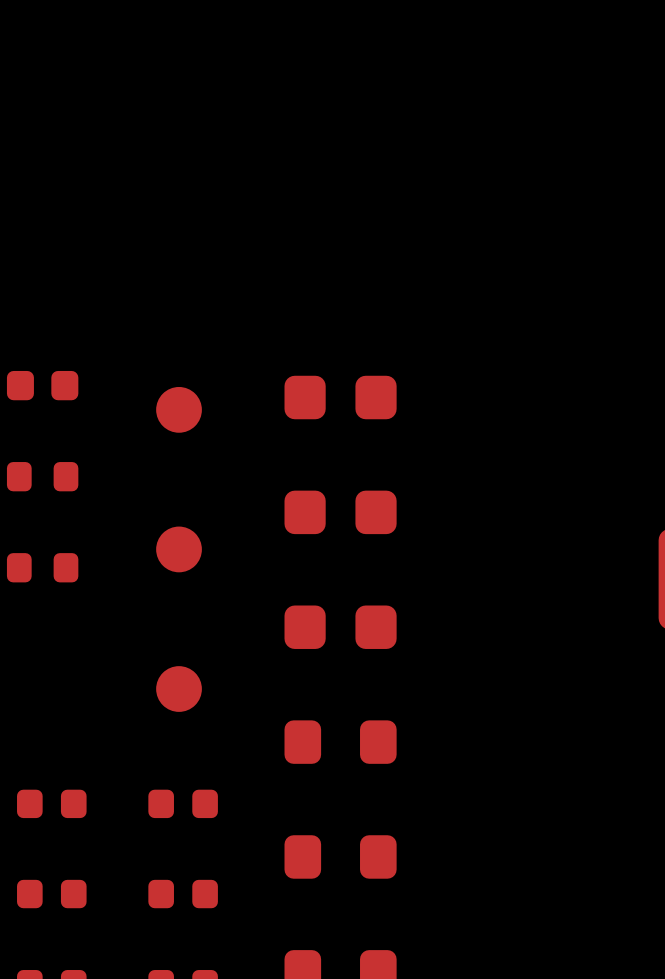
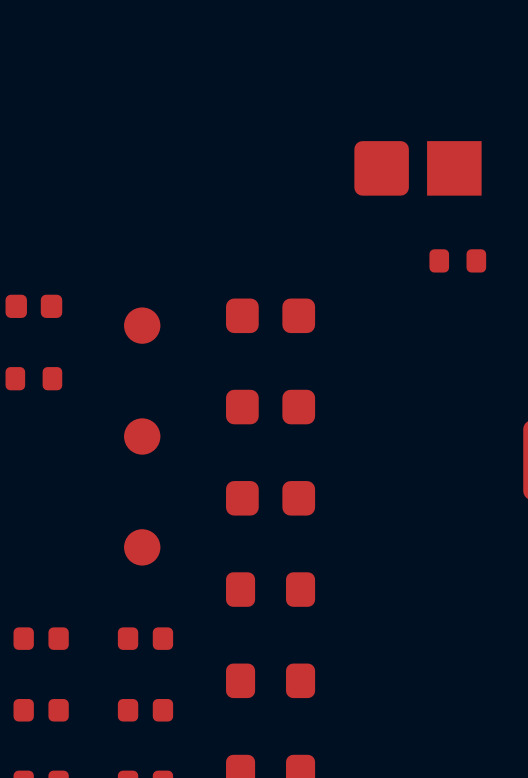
part: none -> (417, 168)
part position: (42, 567) -> (457, 260)

